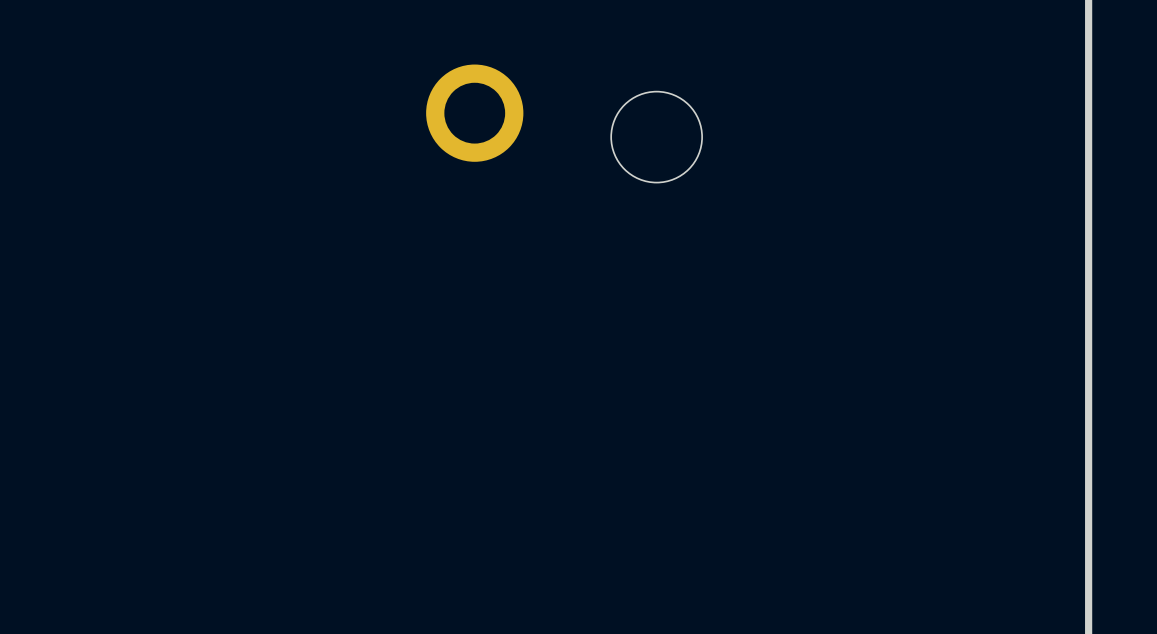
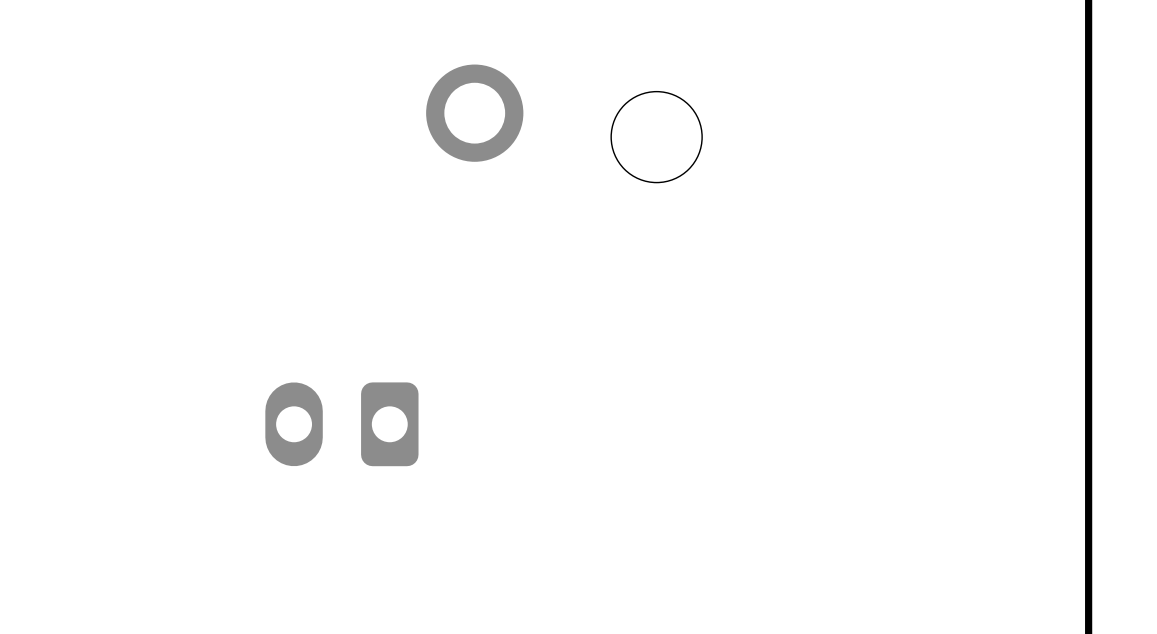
part: none -> (341, 424)

